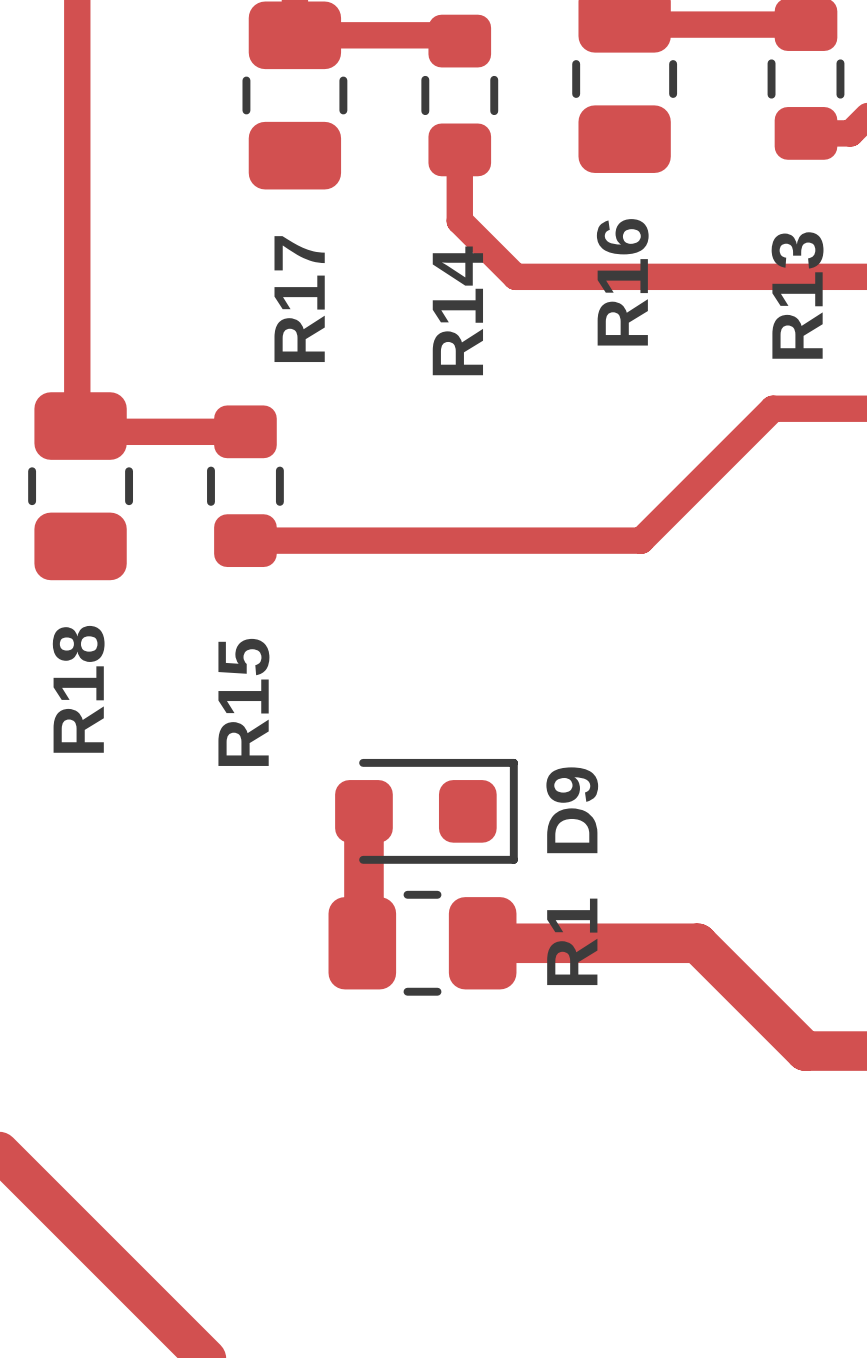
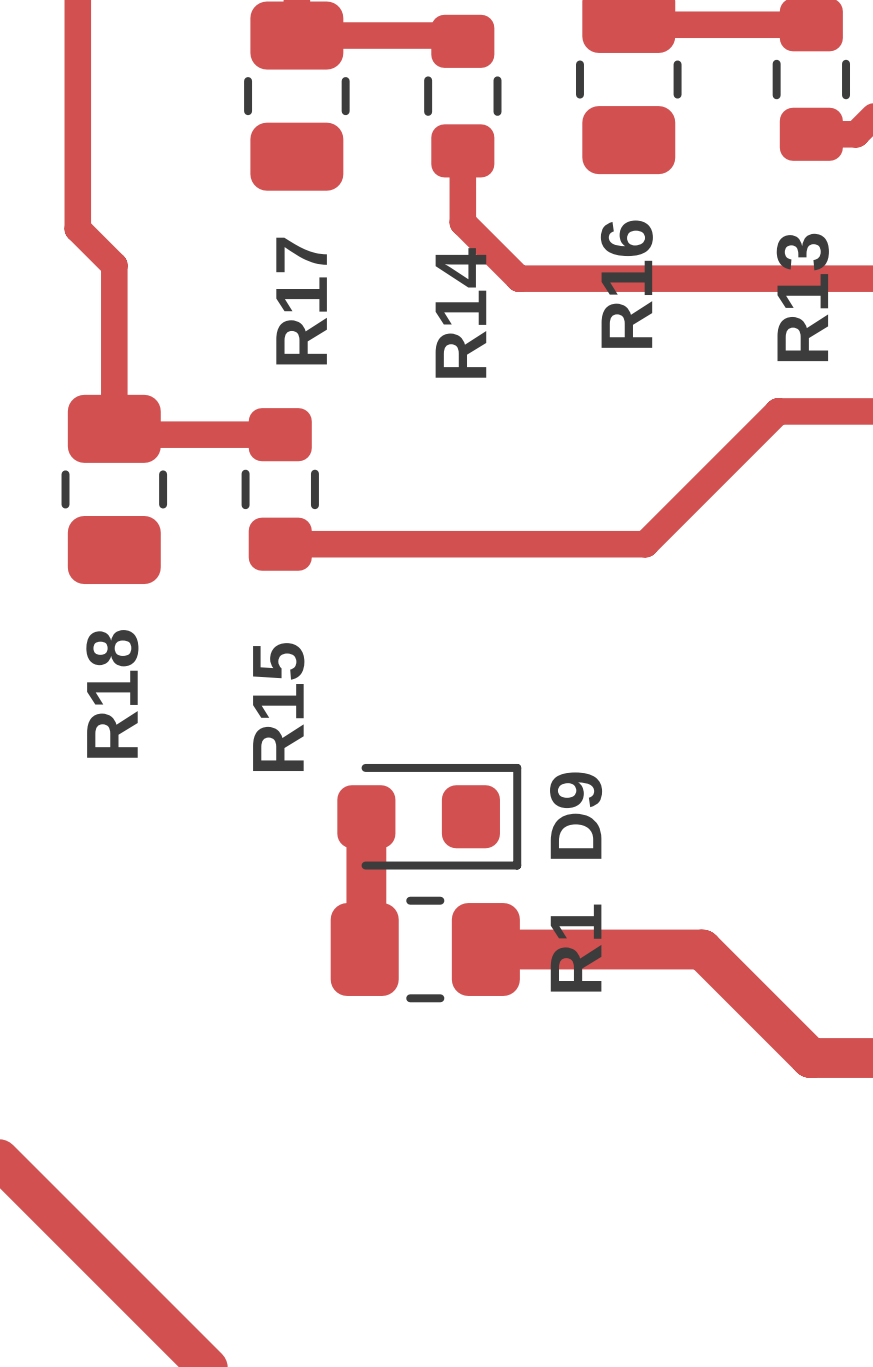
top track: (77, 227) (77, 422) (86, 431) (119, 431) -> (77, 228) (114, 265) (114, 428) (120, 434)
R18 position: (80, 486) -> (114, 489)
R15 position: (245, 486) -> (280, 489)

